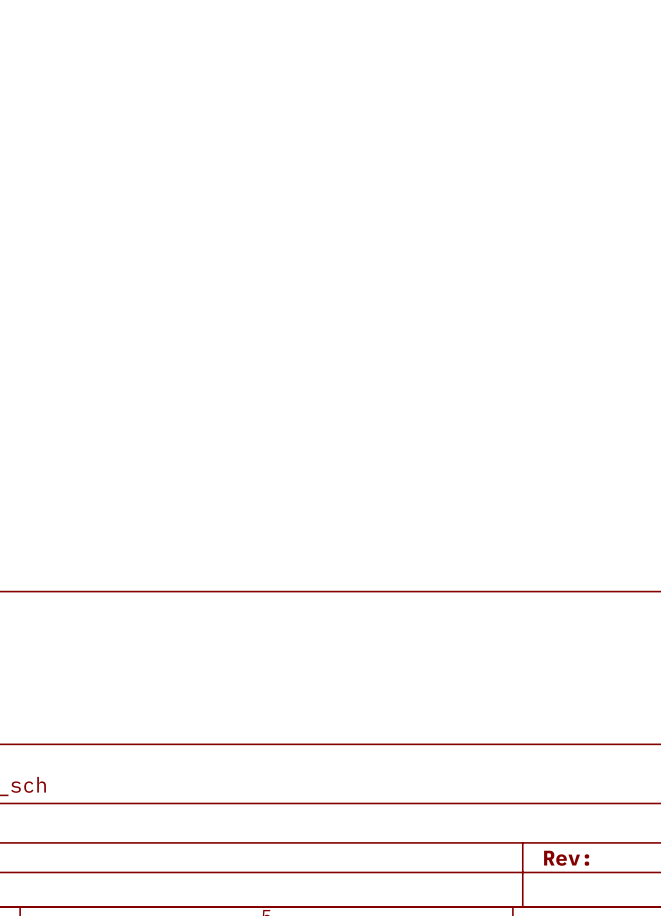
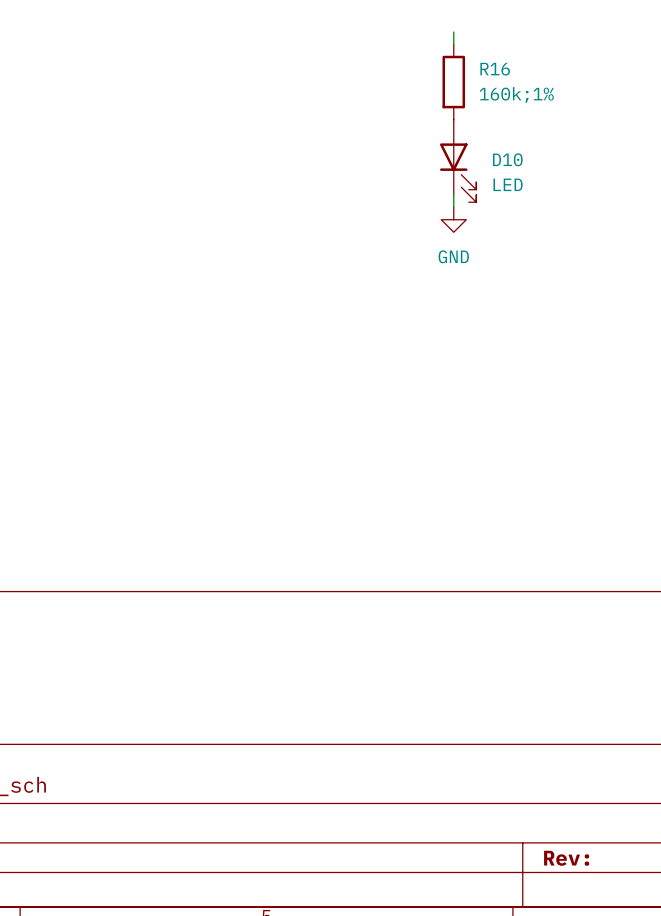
wire: none -> (453, 31) (453, 44)
R16: none -> 160k;1% (453, 82)
D10: none -> LED (458, 160)
wire: none -> (453, 194) (453, 207)
power symbol: none -> GND (453, 219)

